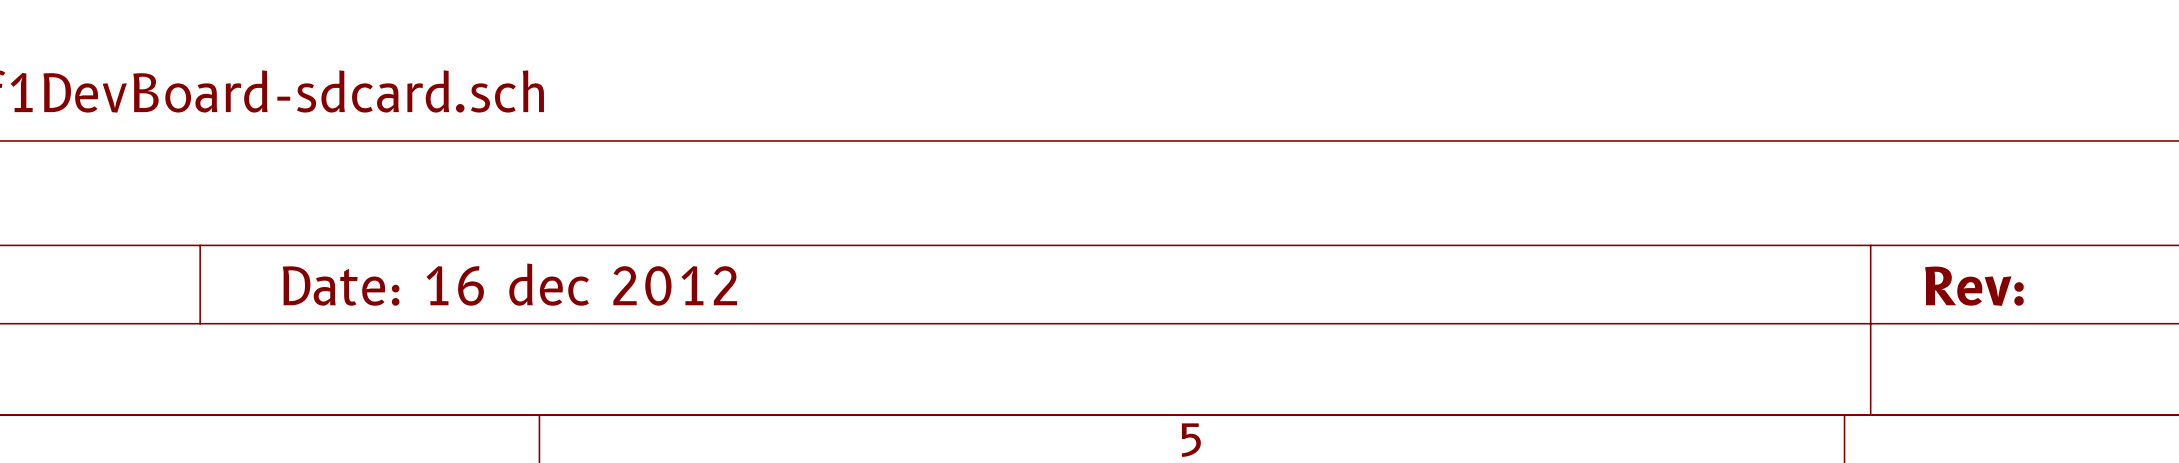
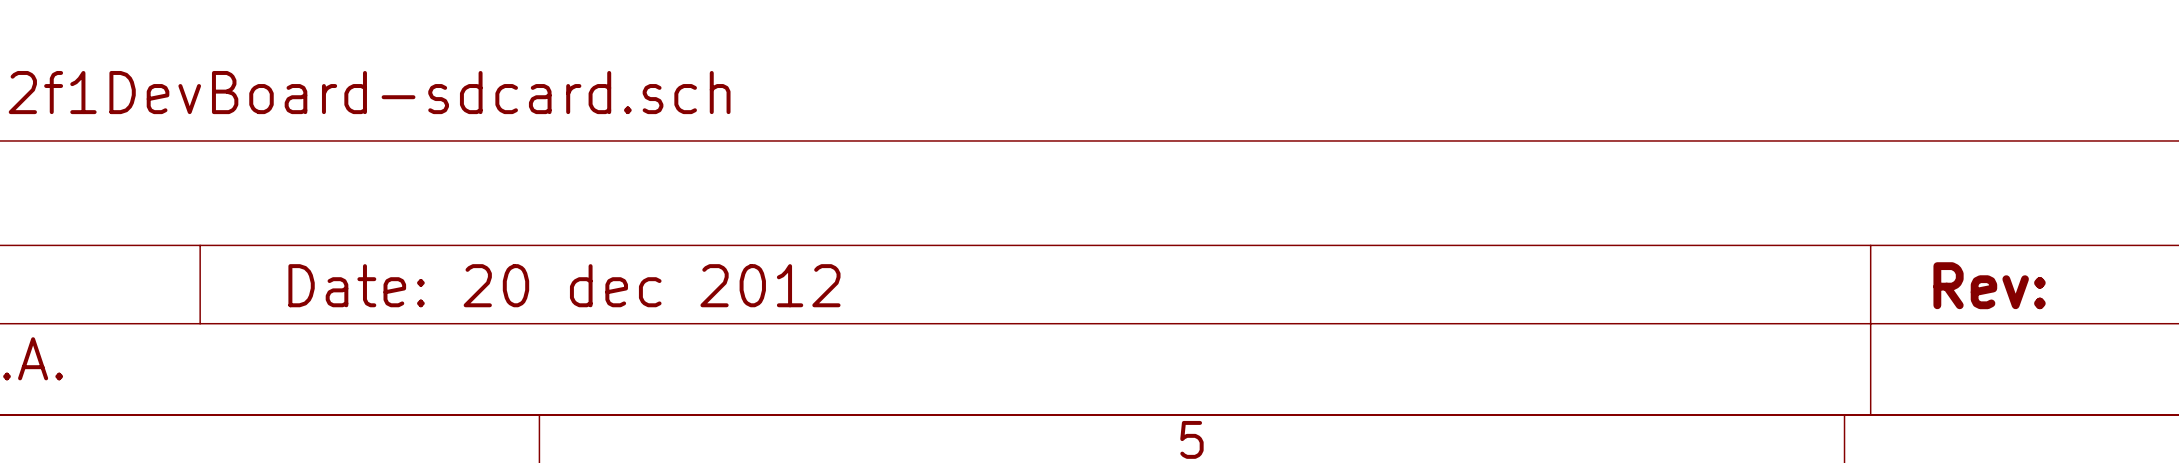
title block: Date: 16 dec 2012 (509, 284) -> Date: 20 dec 2012 (564, 285)

